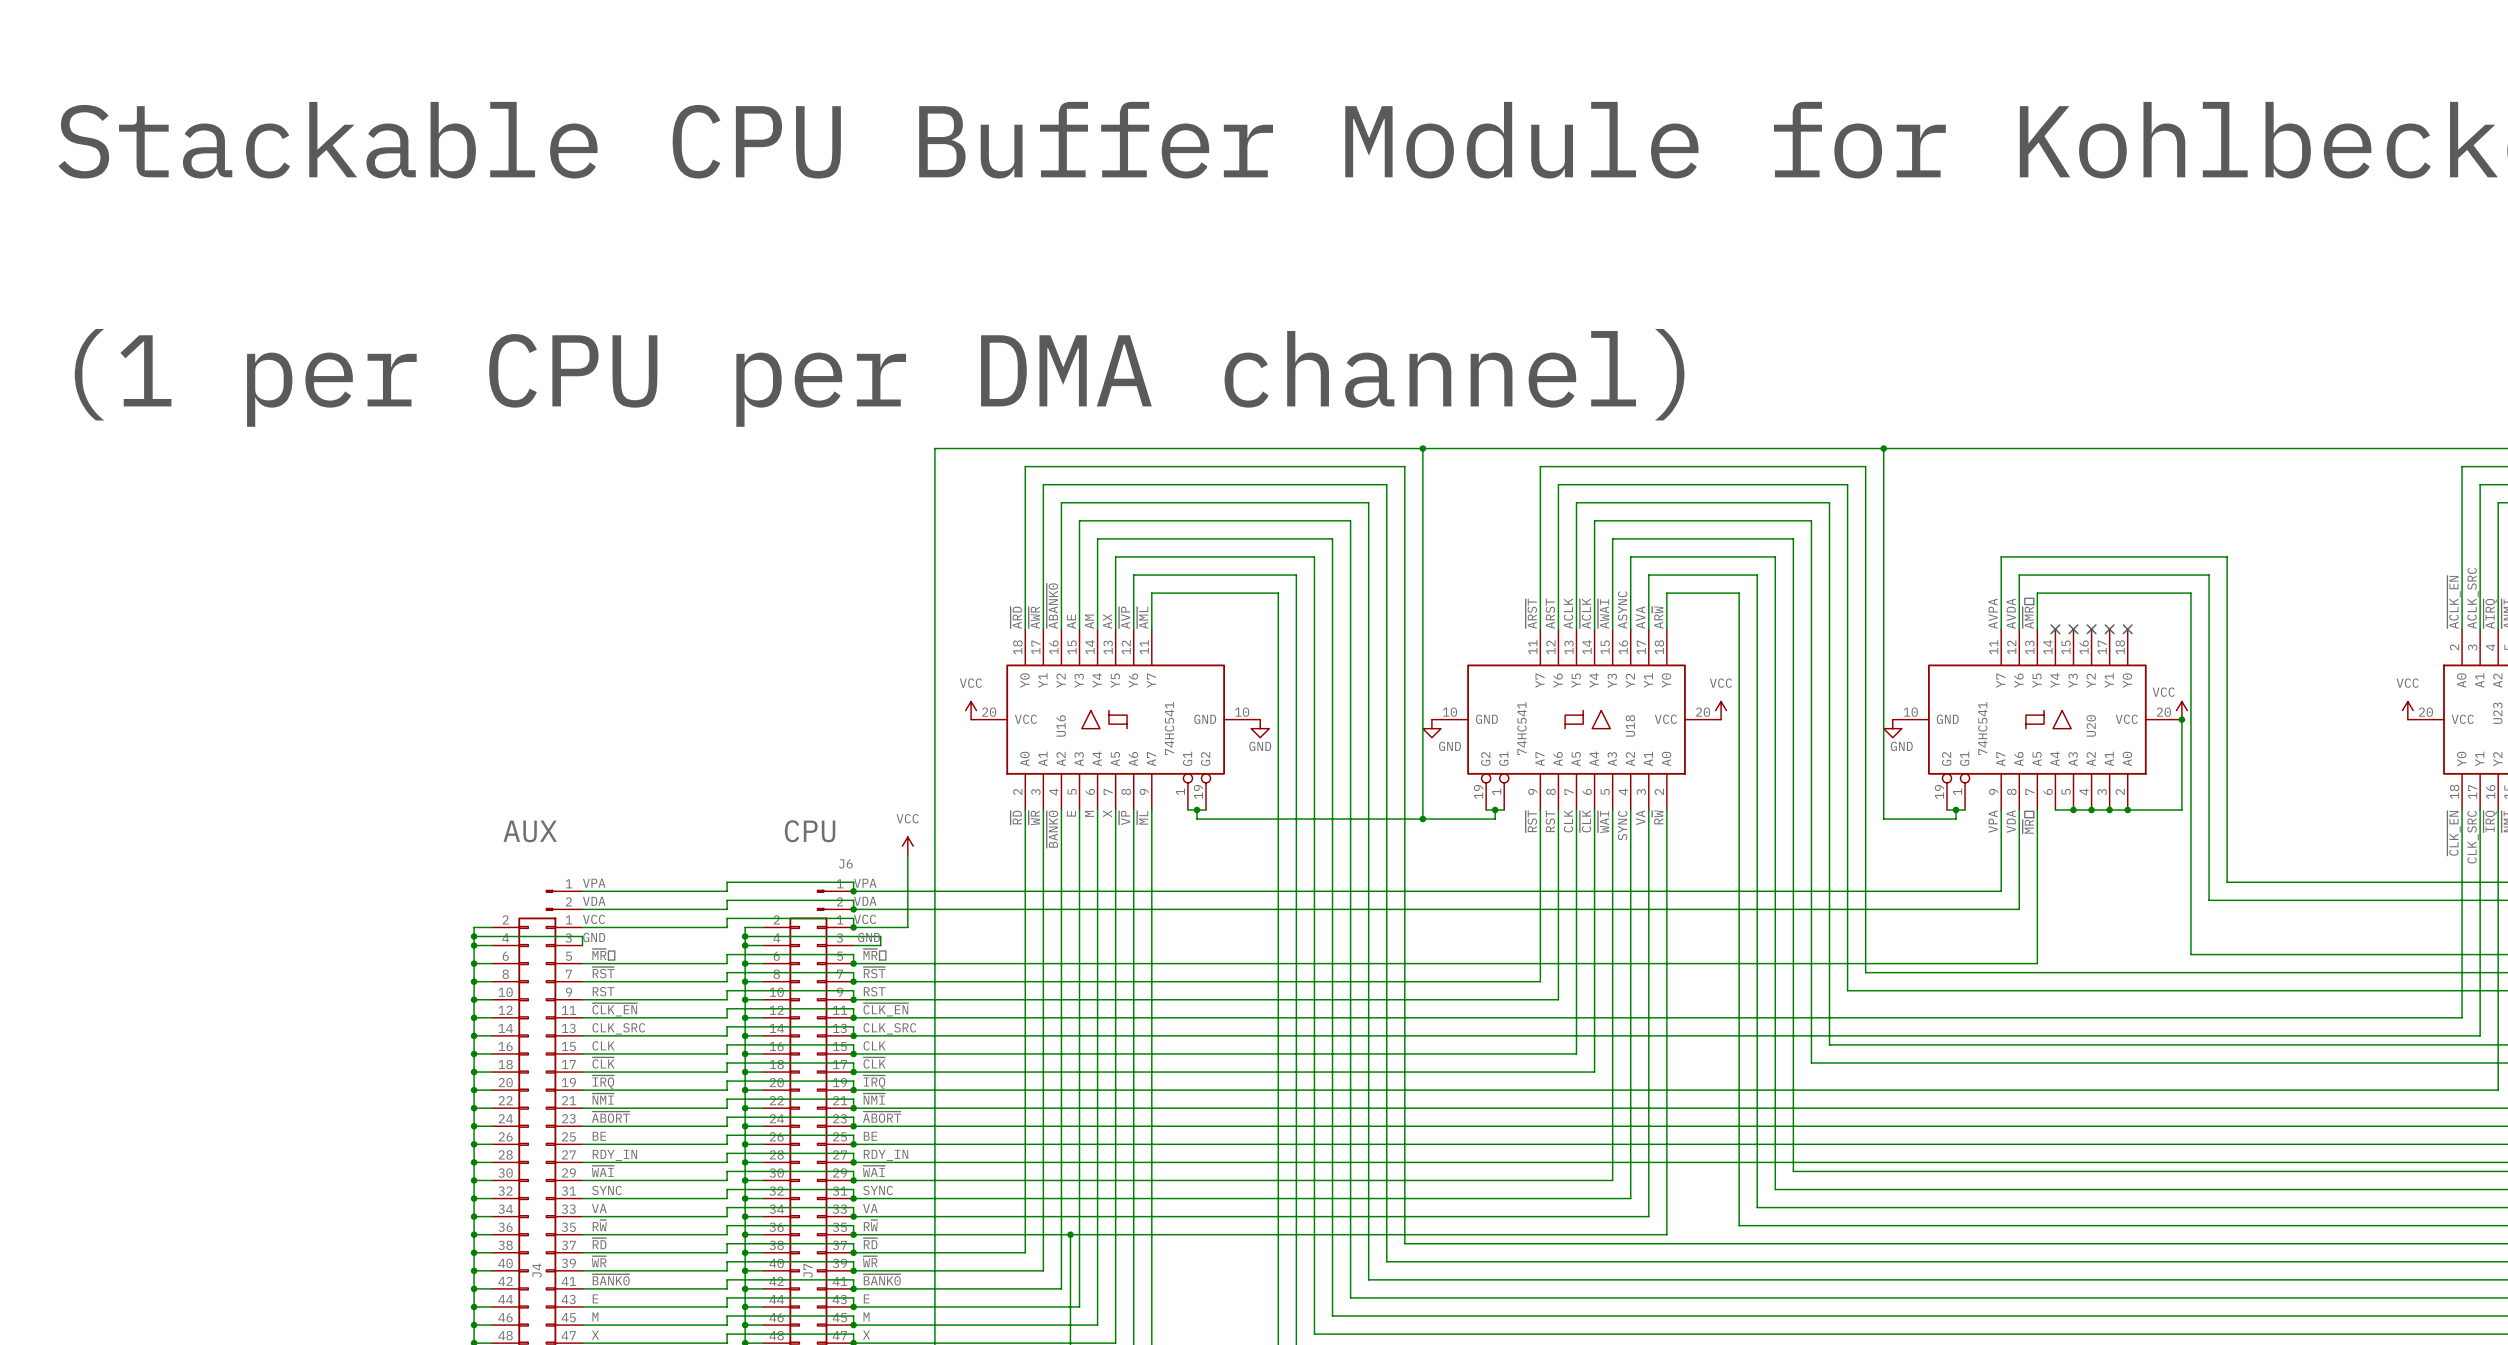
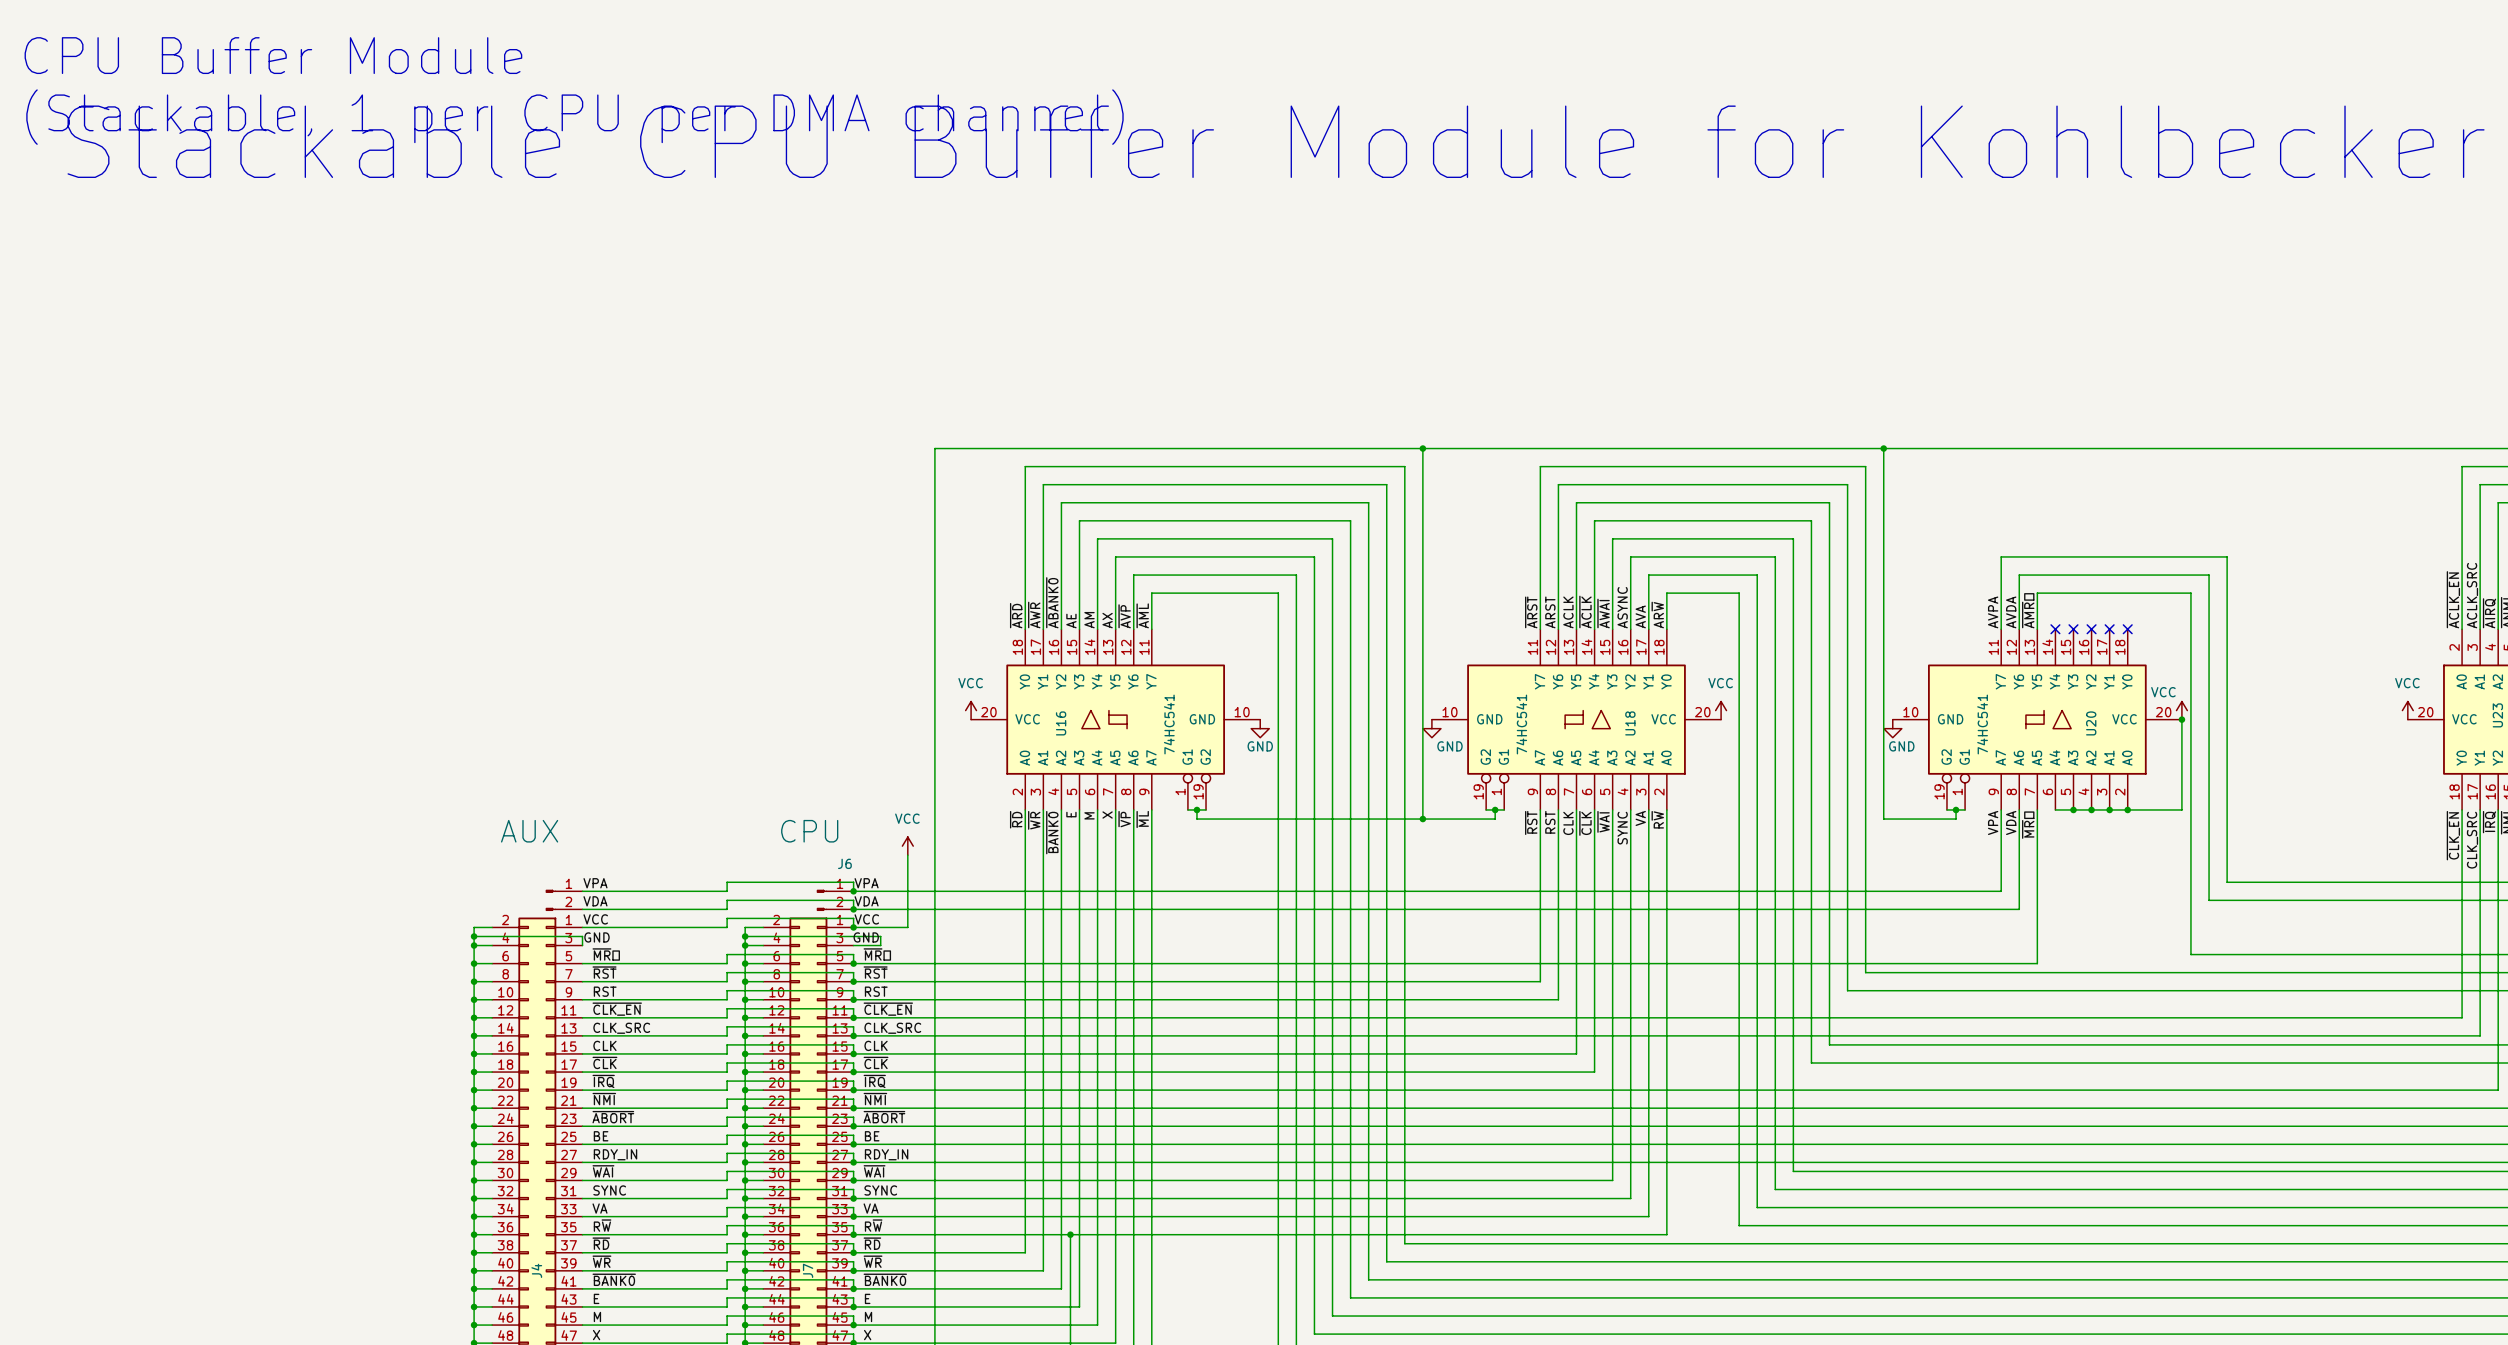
text: none -> CPU Buffer Module (273, 55)
text: none -> (Stackable, 1 per CPU per DMA channel) (574, 117)
text: (1 per CPU per DMA channel) (879, 377) -> none

